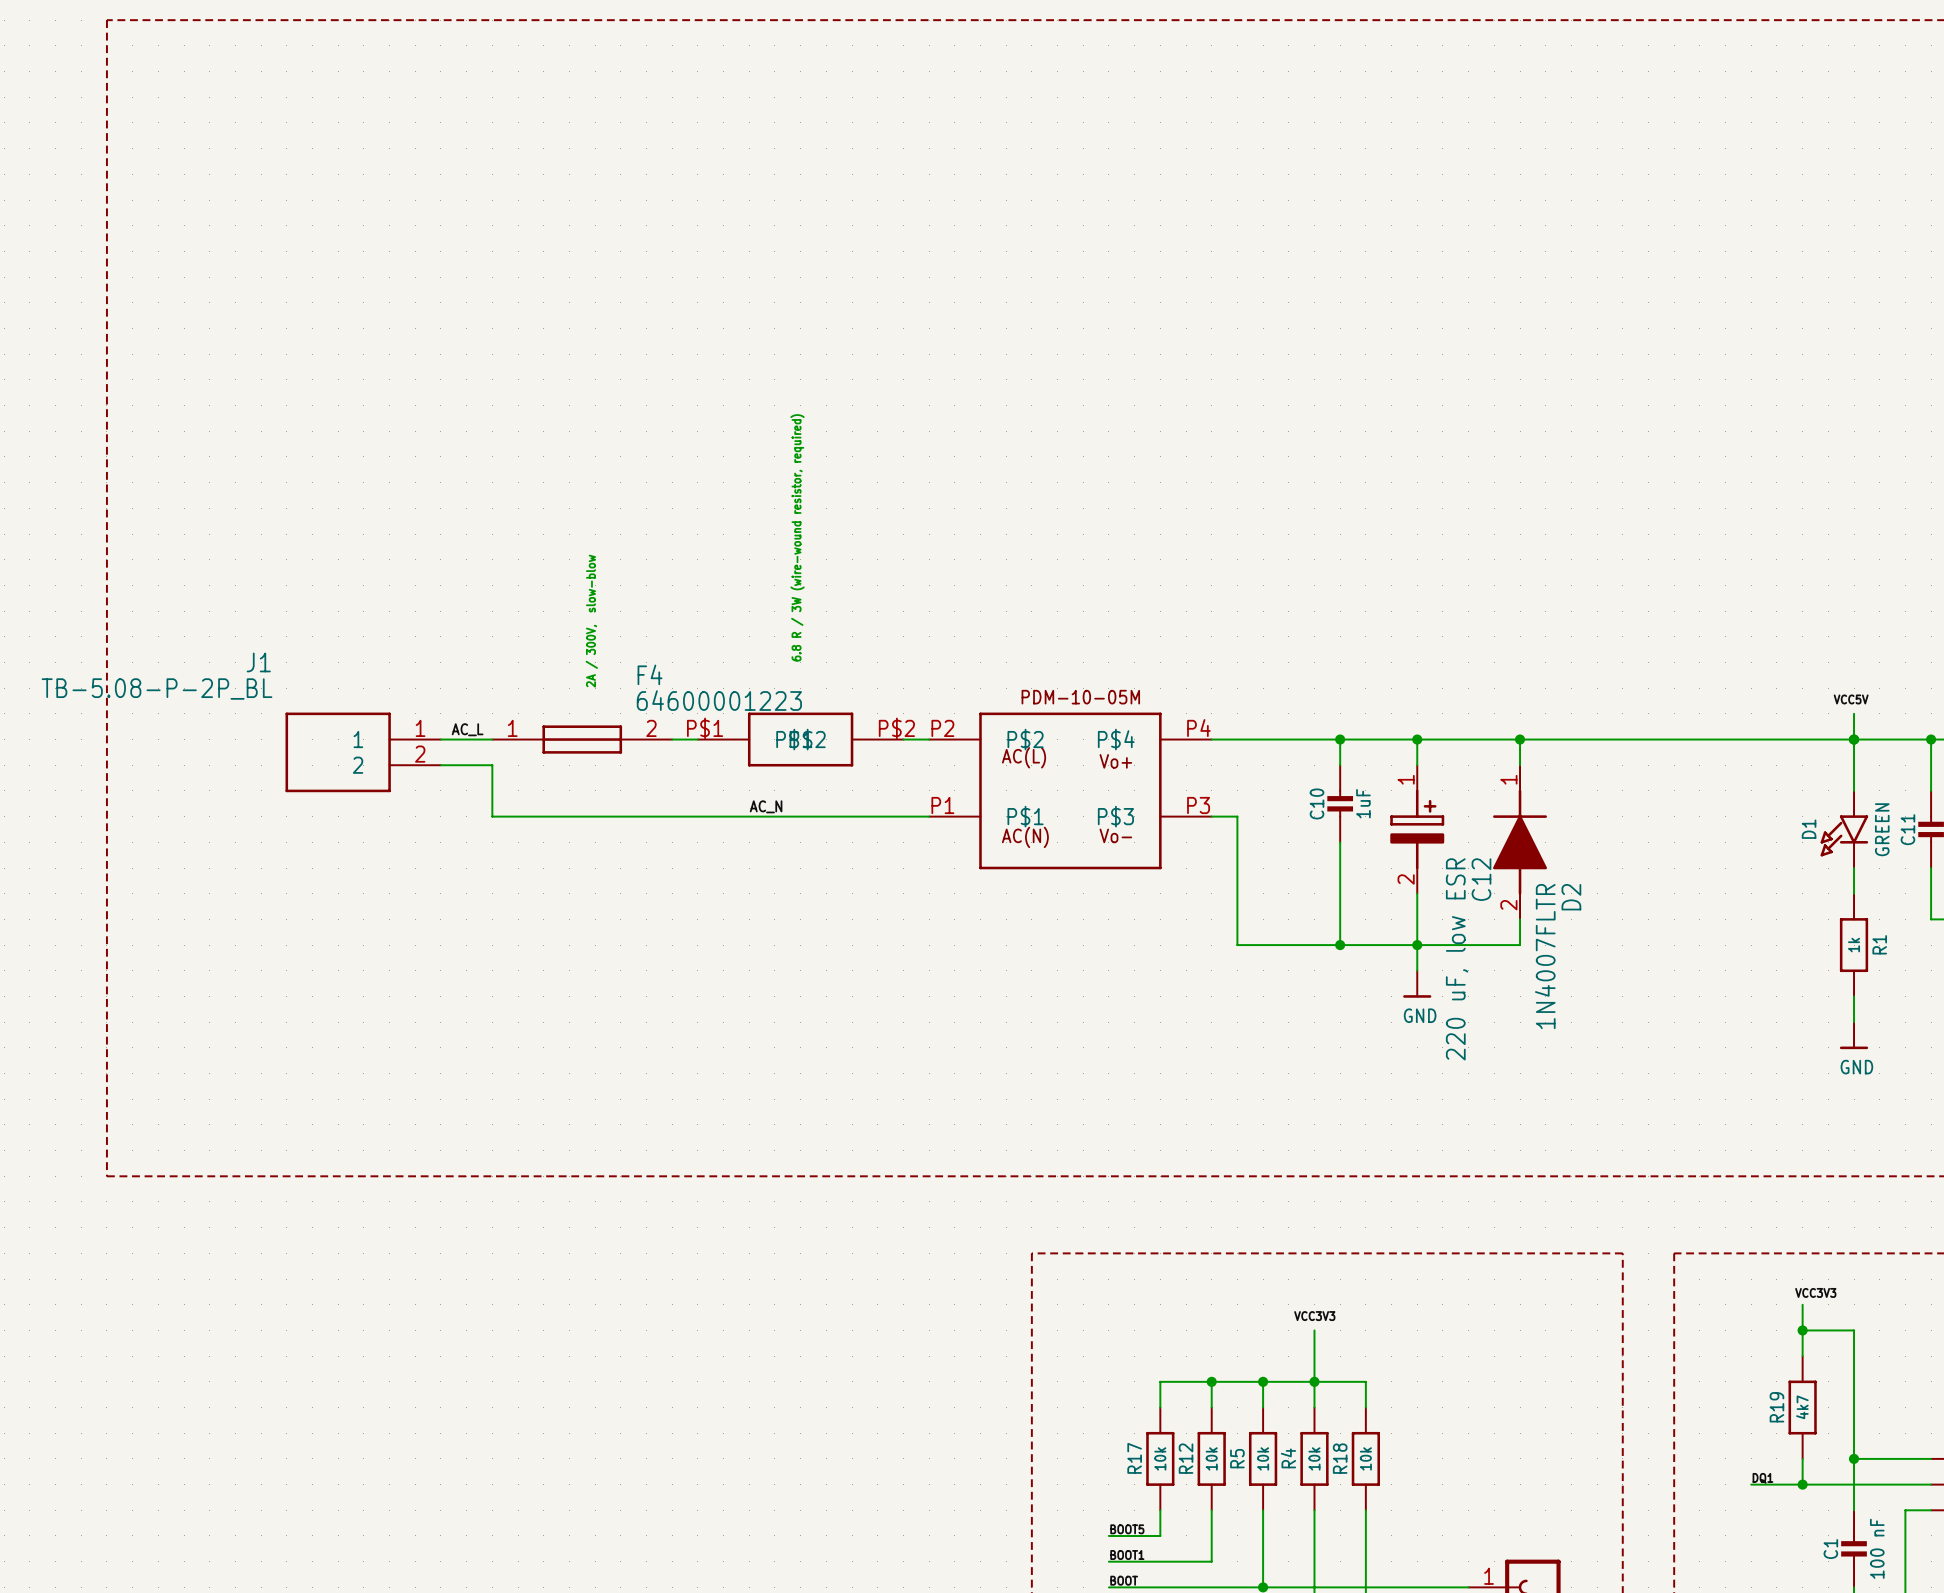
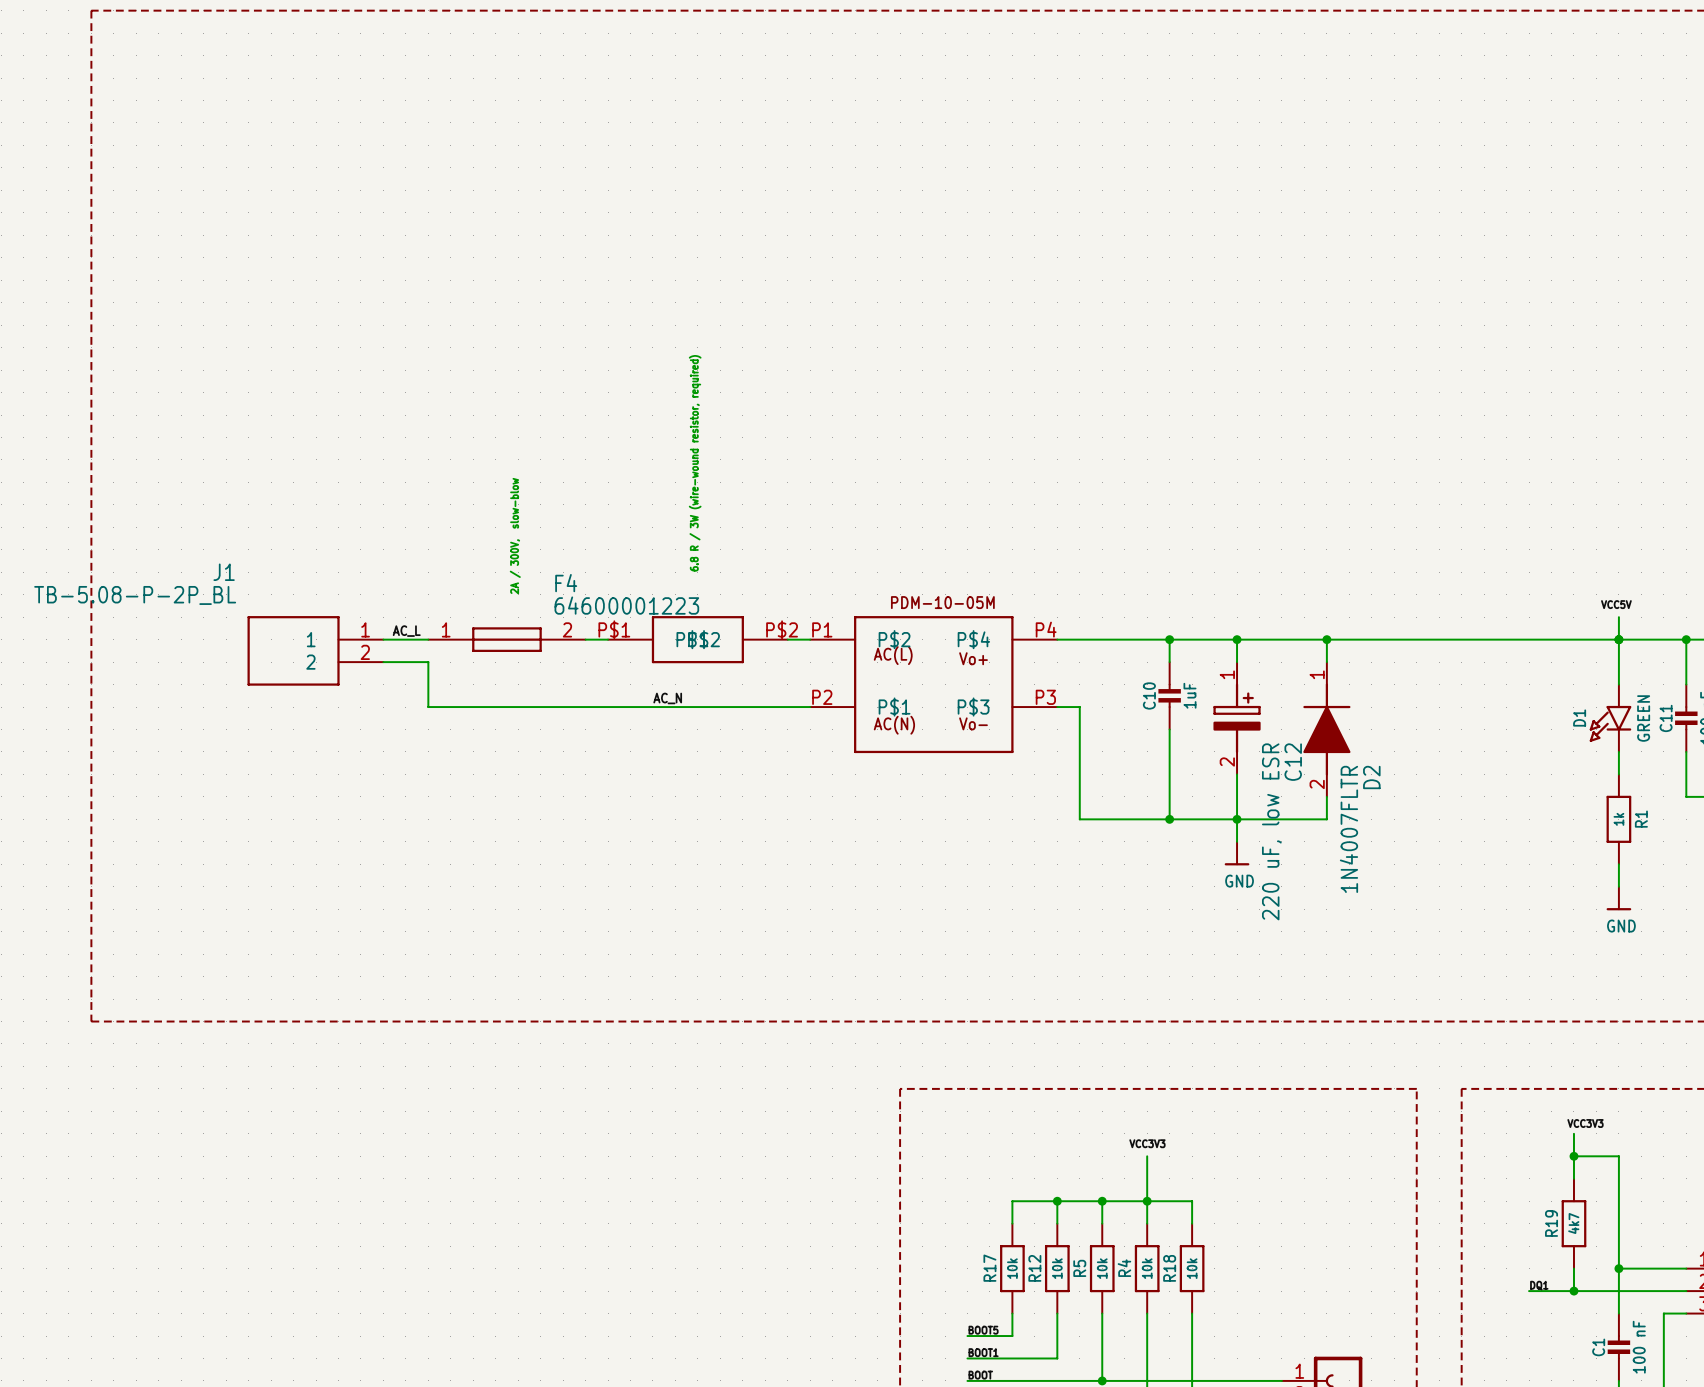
part pin number: P2 (942, 728) -> P1 (822, 629)
part pin number: P1 (942, 805) -> P2 (822, 697)

